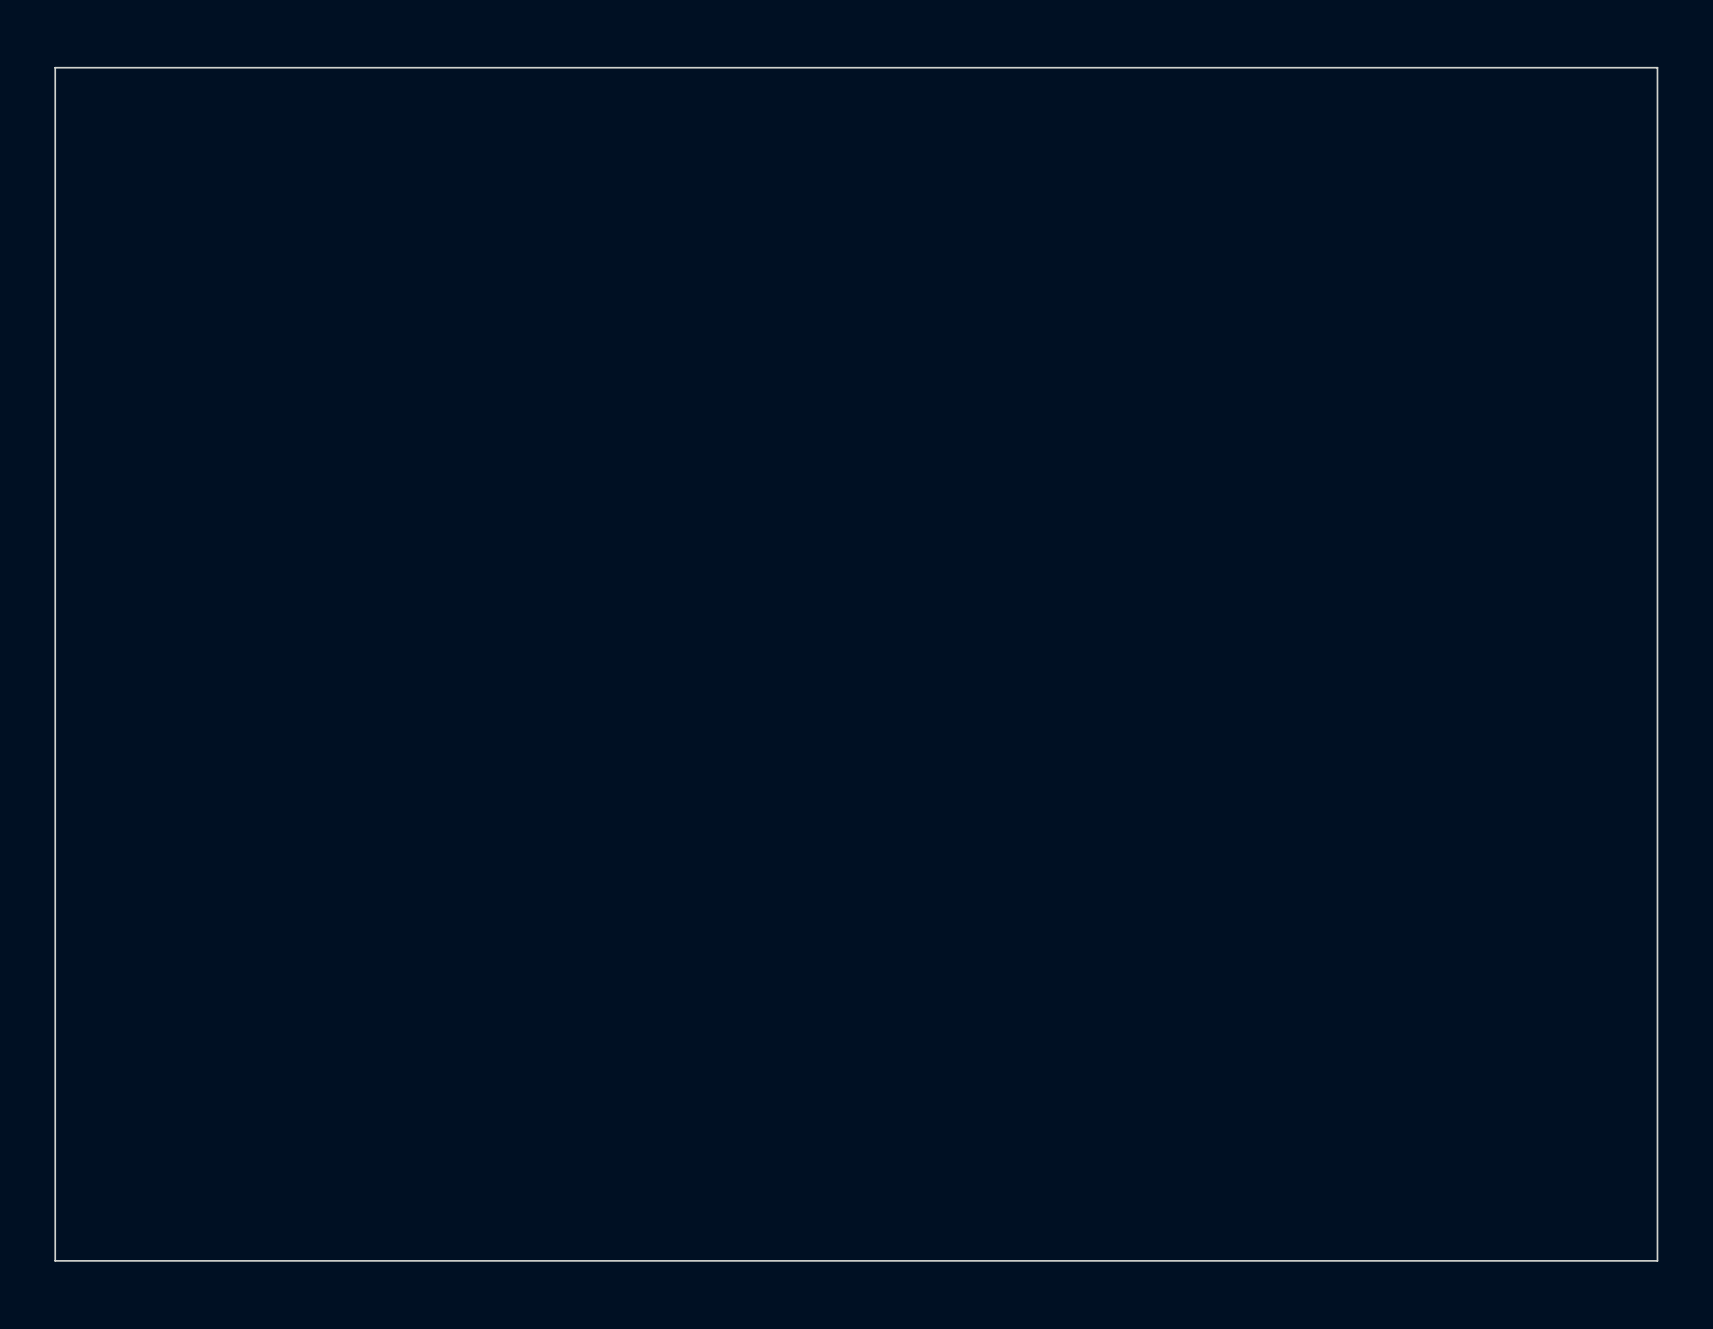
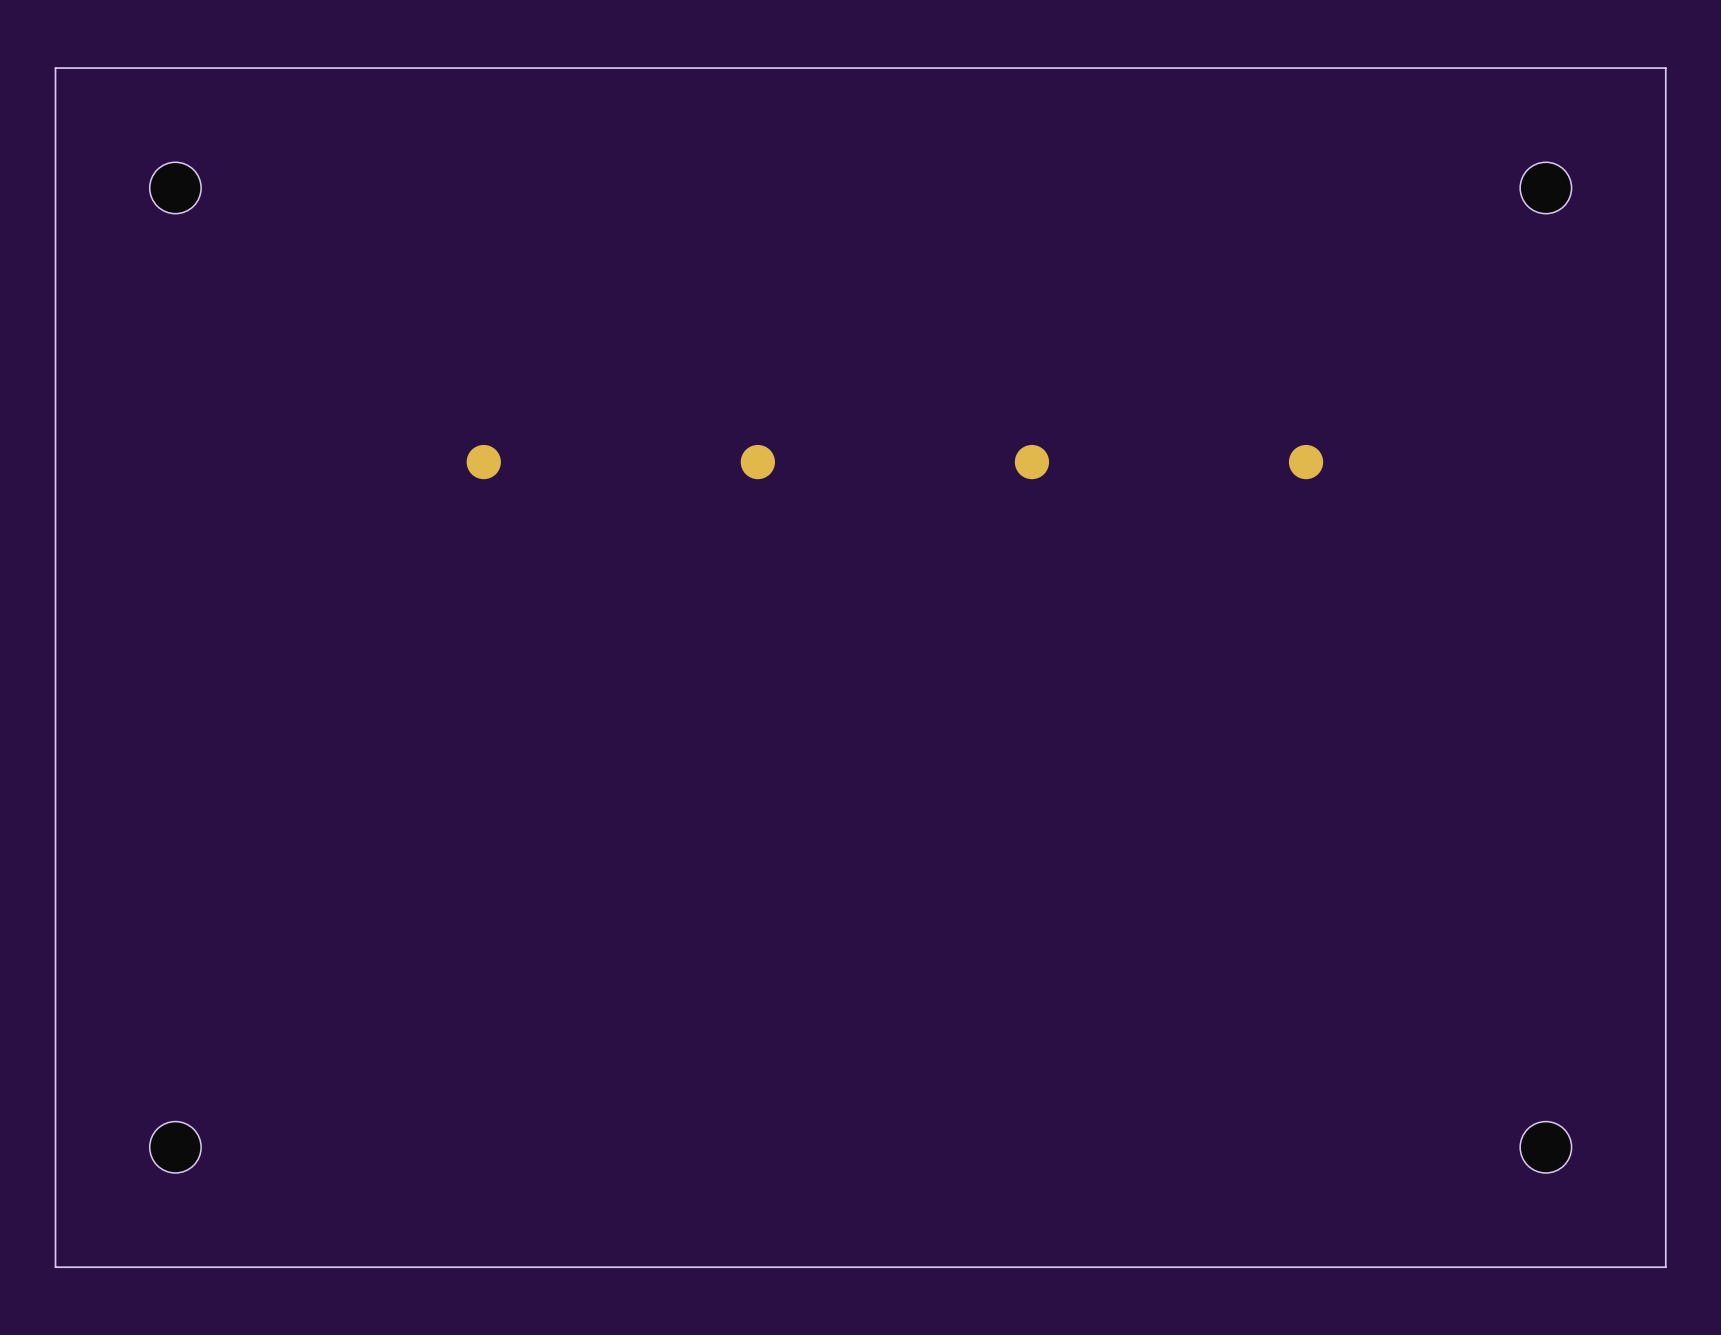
part: none -> (175, 187)
part: none -> (1545, 187)
part: none -> (483, 462)
part: none -> (757, 462)
part: none -> (1031, 462)
part: none -> (1306, 462)
part: none -> (175, 1147)
part: none -> (1545, 1147)

